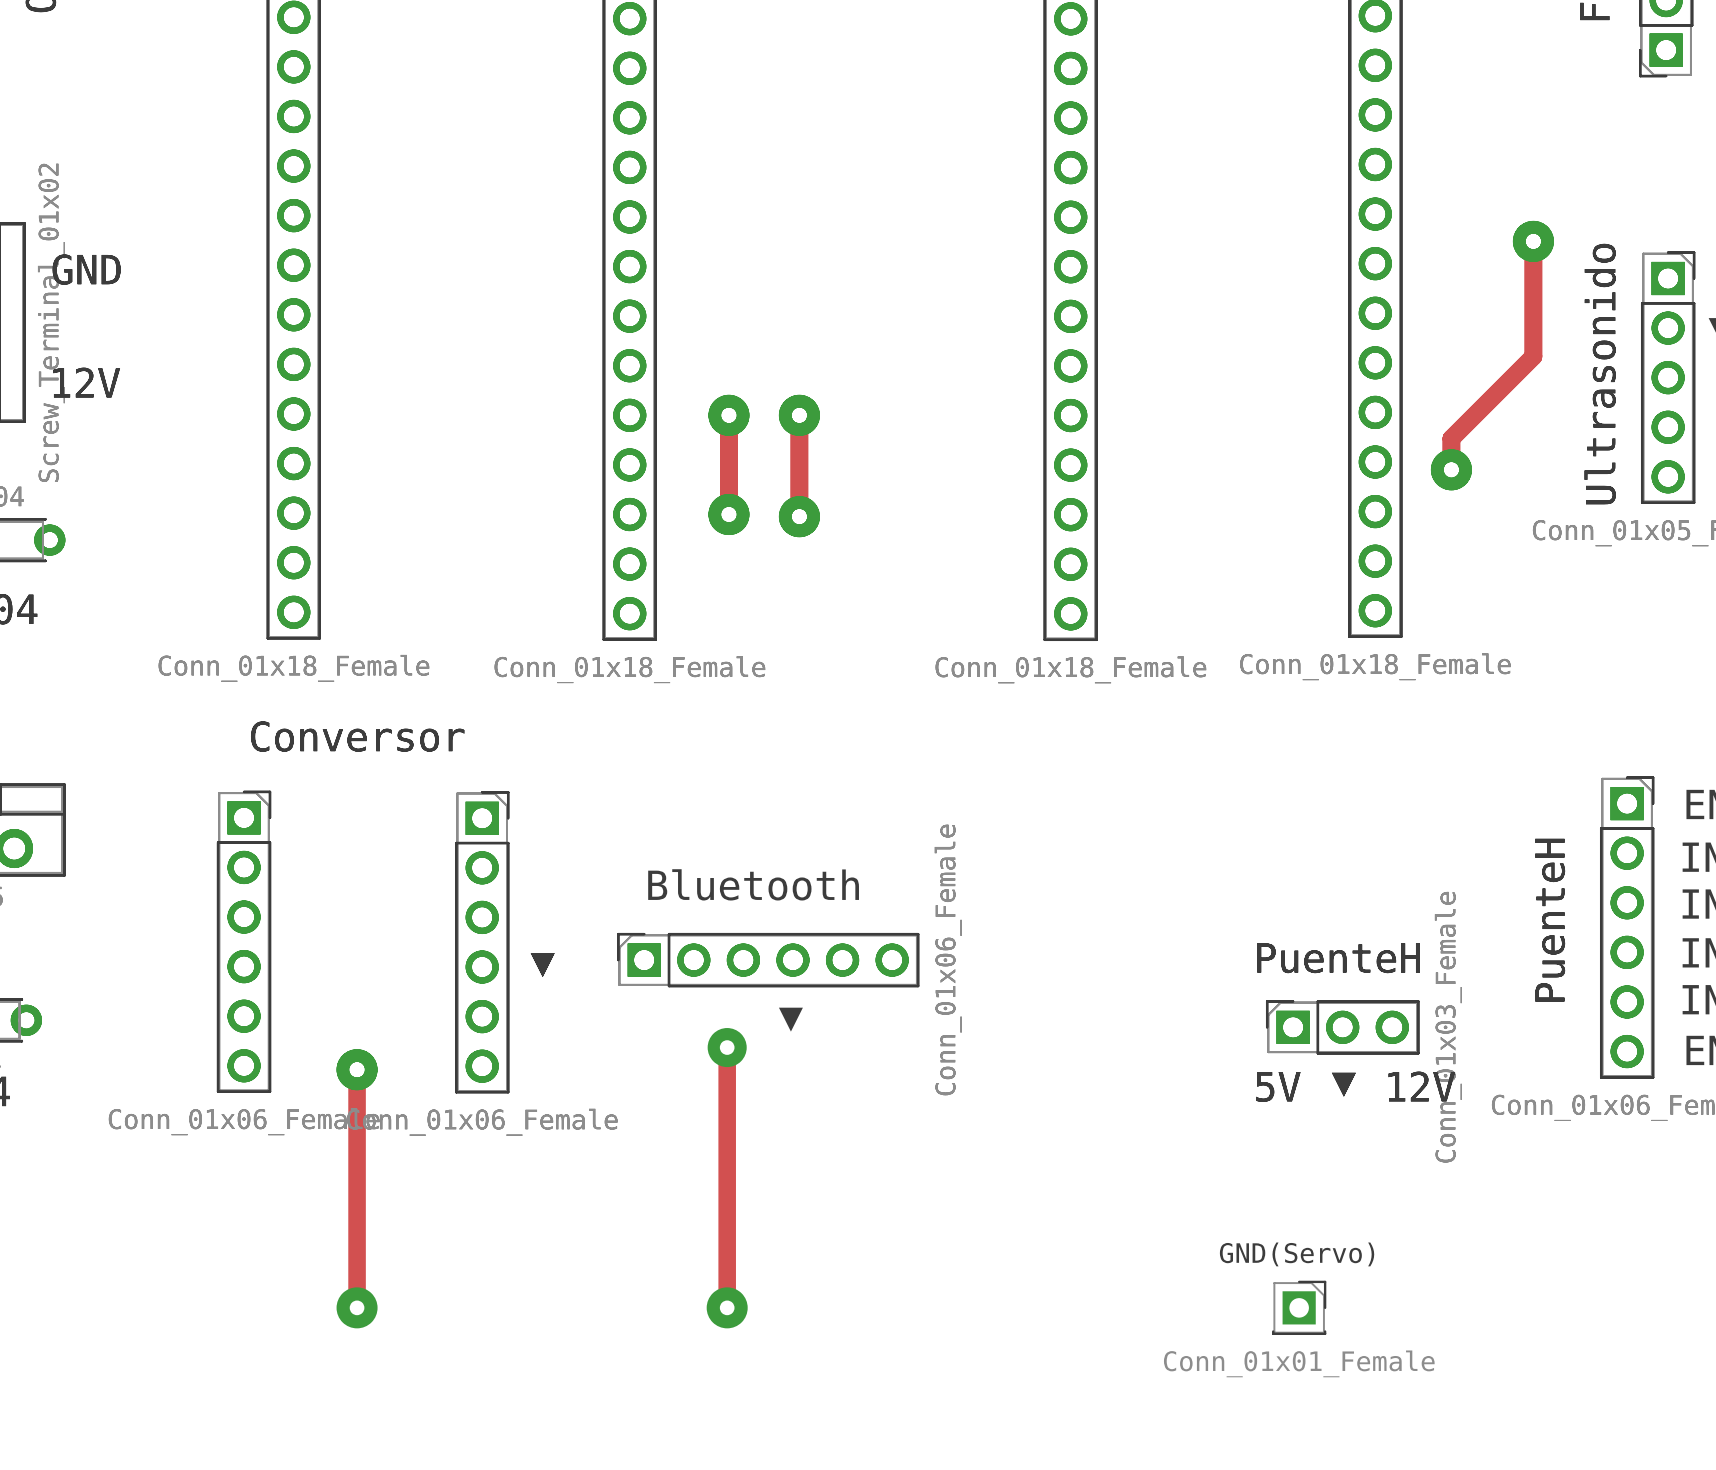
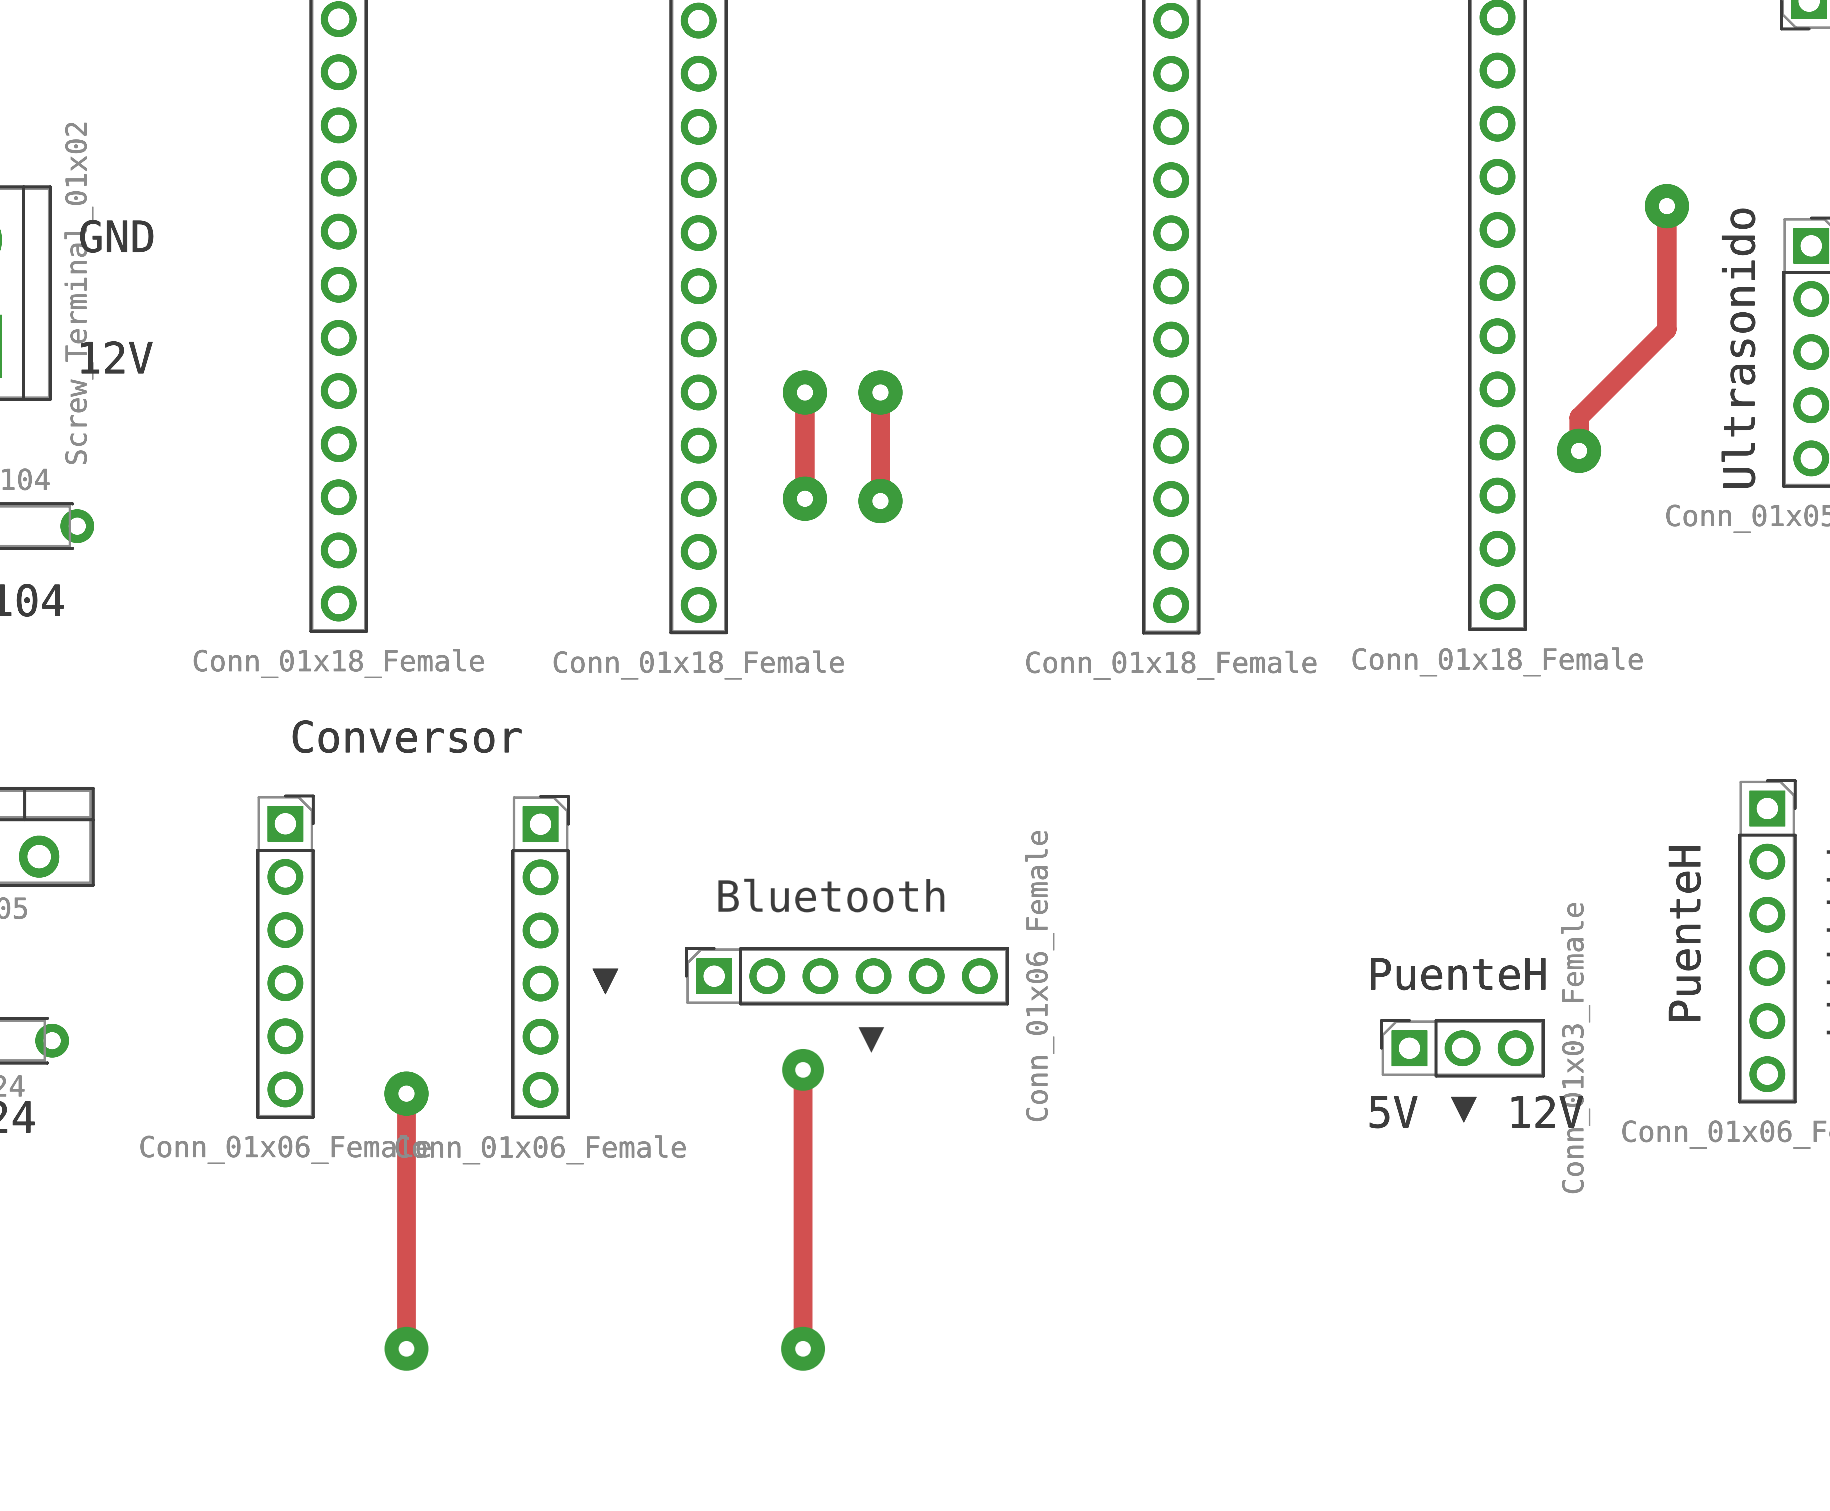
GND(Servo): Conn_01x01_Female (1299, 1307) -> none

